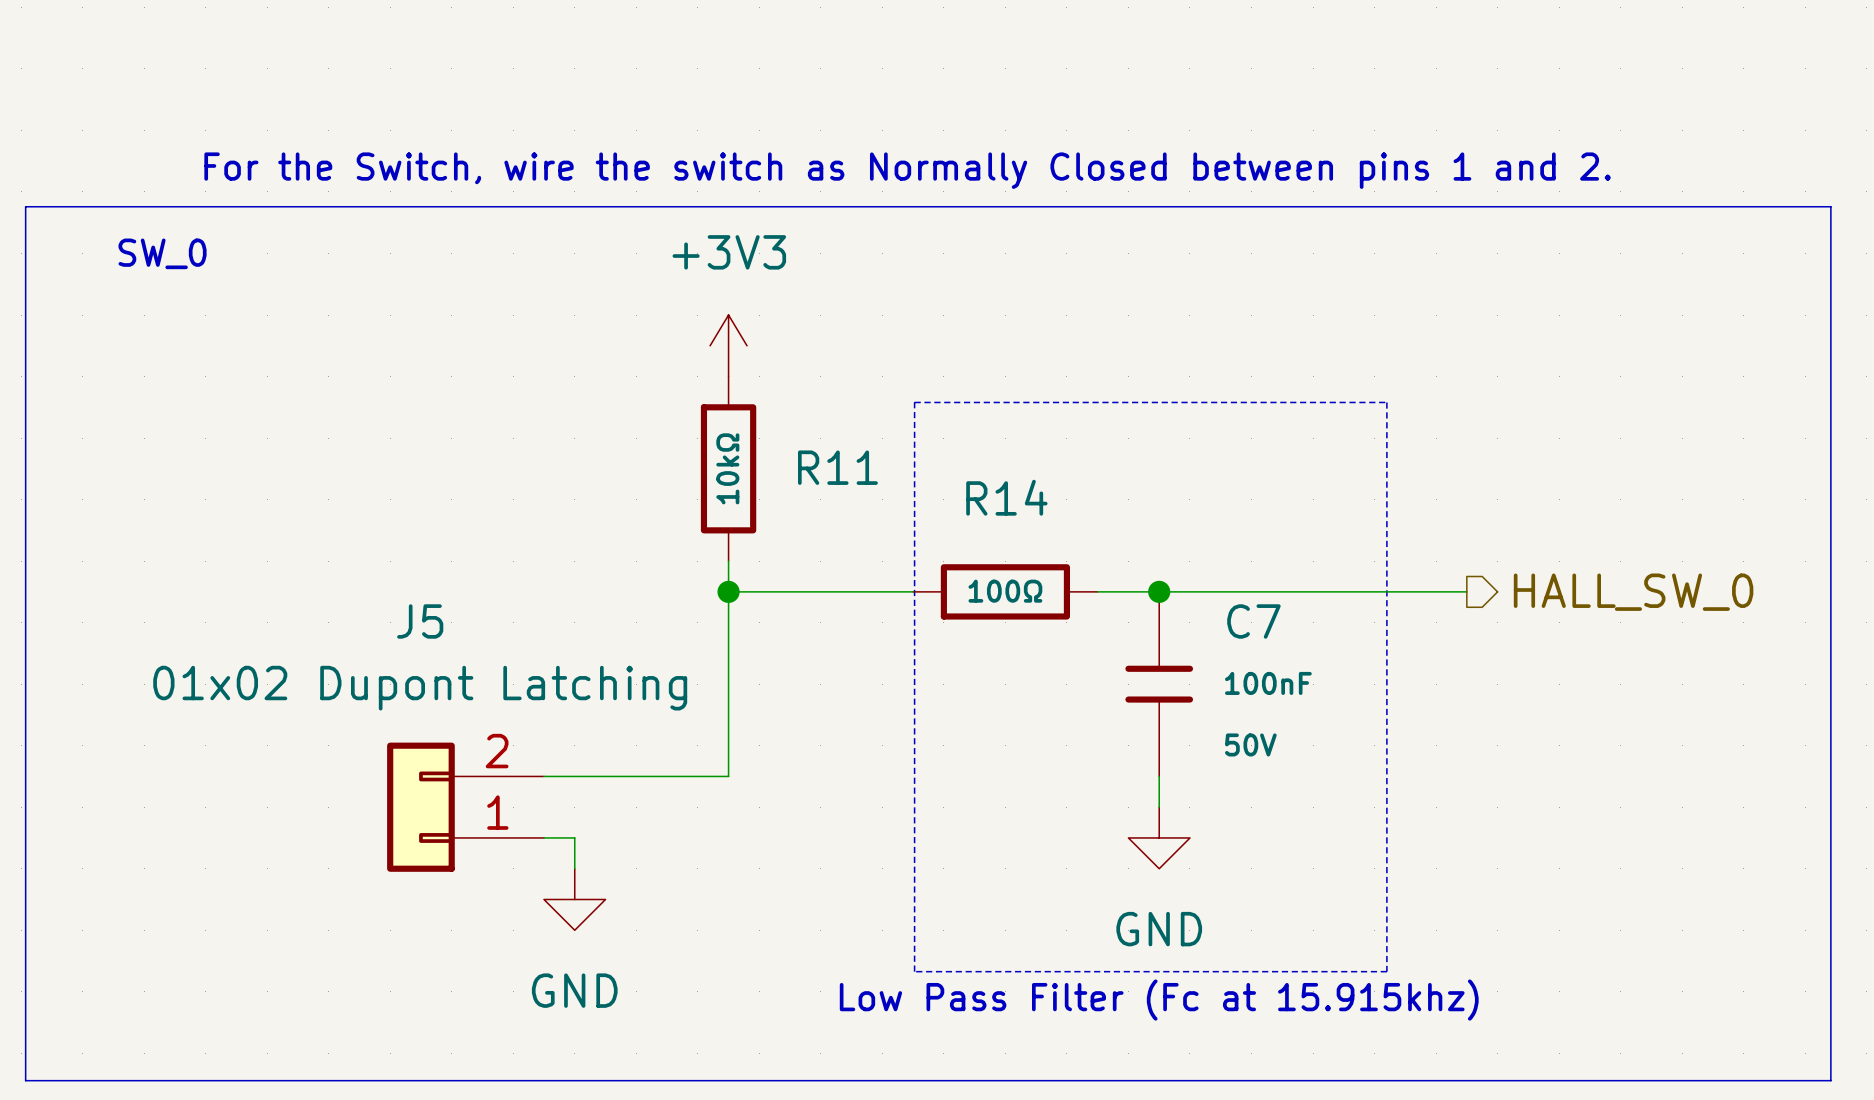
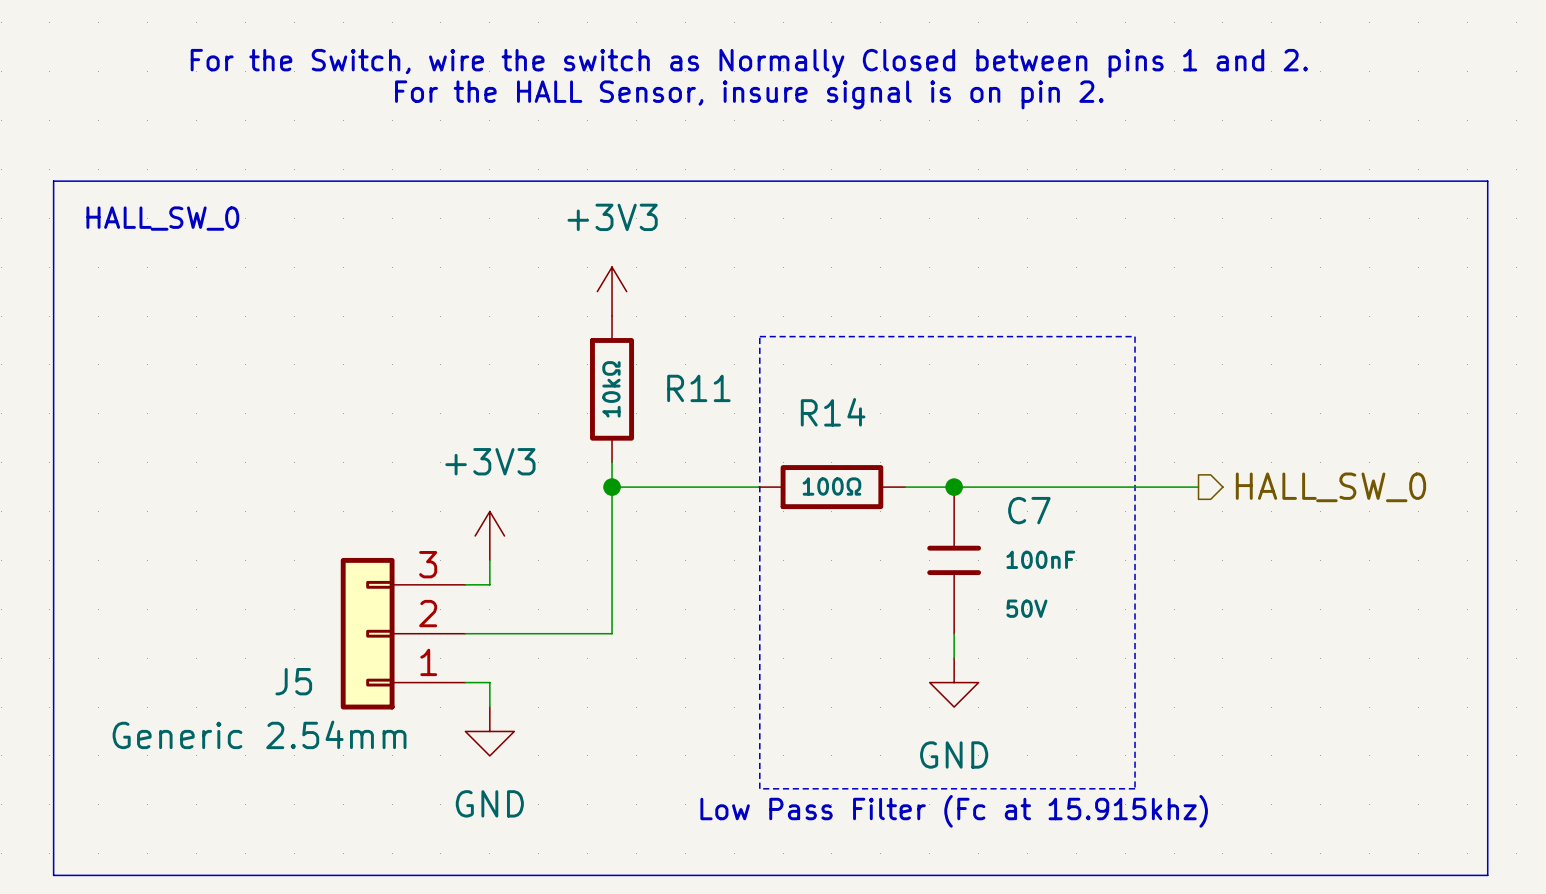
text: none -> For the HALL Sensor, insure signal is on pin 2. (749, 94)
text position: For the Switch, wire the switch as Normally Closed between pins 1 and 2. (907, 170) -> For the Switch, wire the switch as Normally Closed between pins 1 and 2. (749, 63)
text: SW_0 (162, 253) -> HALL_SW_0 (162, 218)
J5 name position: J5 (420, 621) -> J5 (293, 681)
power symbol: none -> +3V3 (489, 535)
wire: none -> (489, 560) (489, 584) (465, 584)
J5 value: 01x02 Dupont Latching (420, 688) -> Generic 2.54mm (259, 734)
J5 symbol: [387, 742, 544, 872] -> [340, 557, 466, 710]

